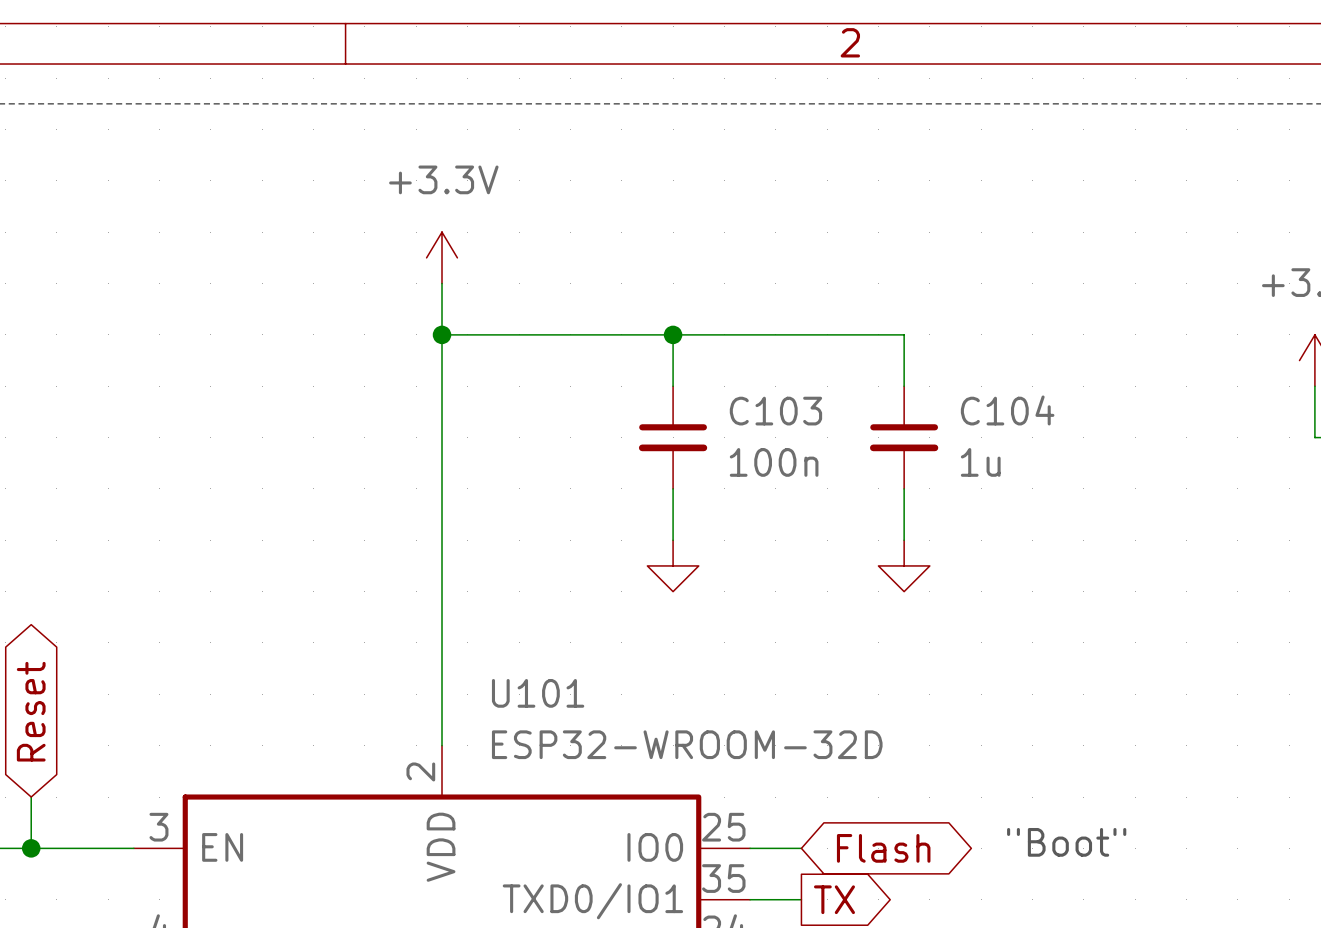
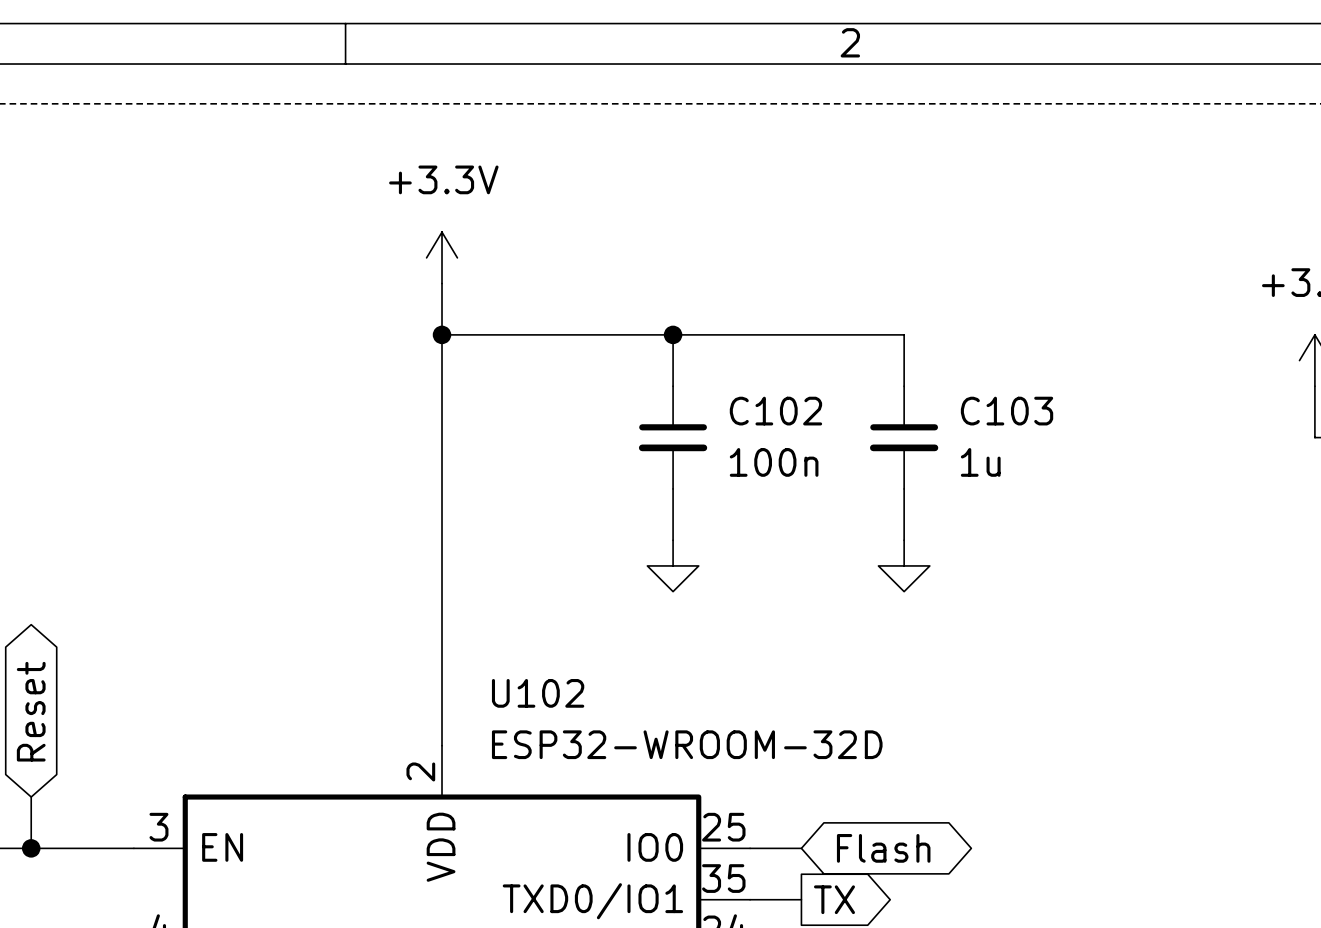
C104 name: C104 (1007, 410) -> C103 (1007, 411)
C103 name: C103 (775, 411) -> C102 (775, 411)
U101 name: U101 (538, 693) -> U102 (538, 693)
text: "Boot" (1066, 842) -> none

